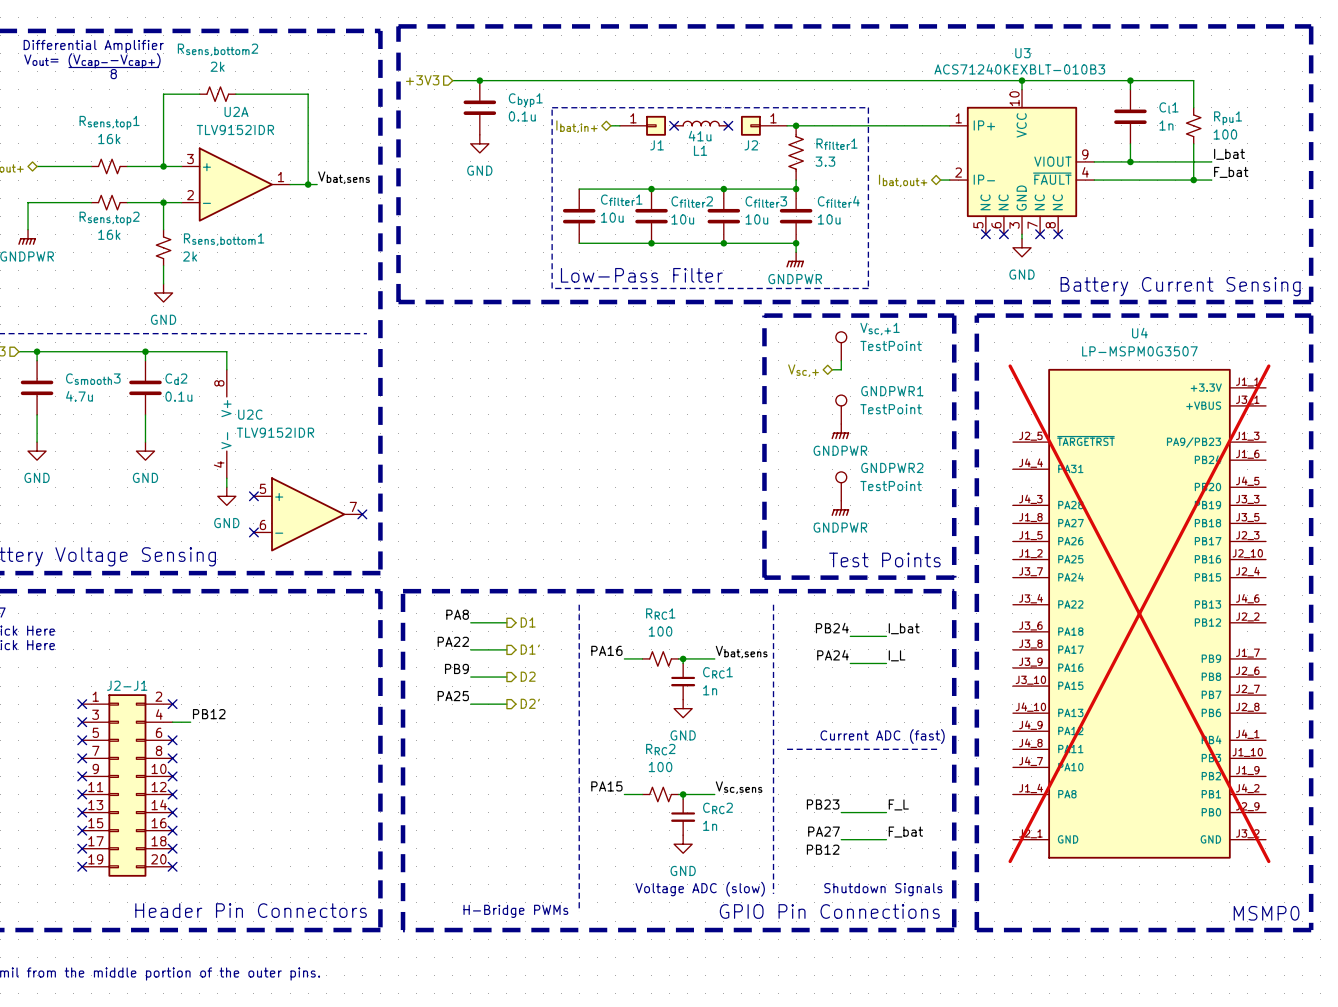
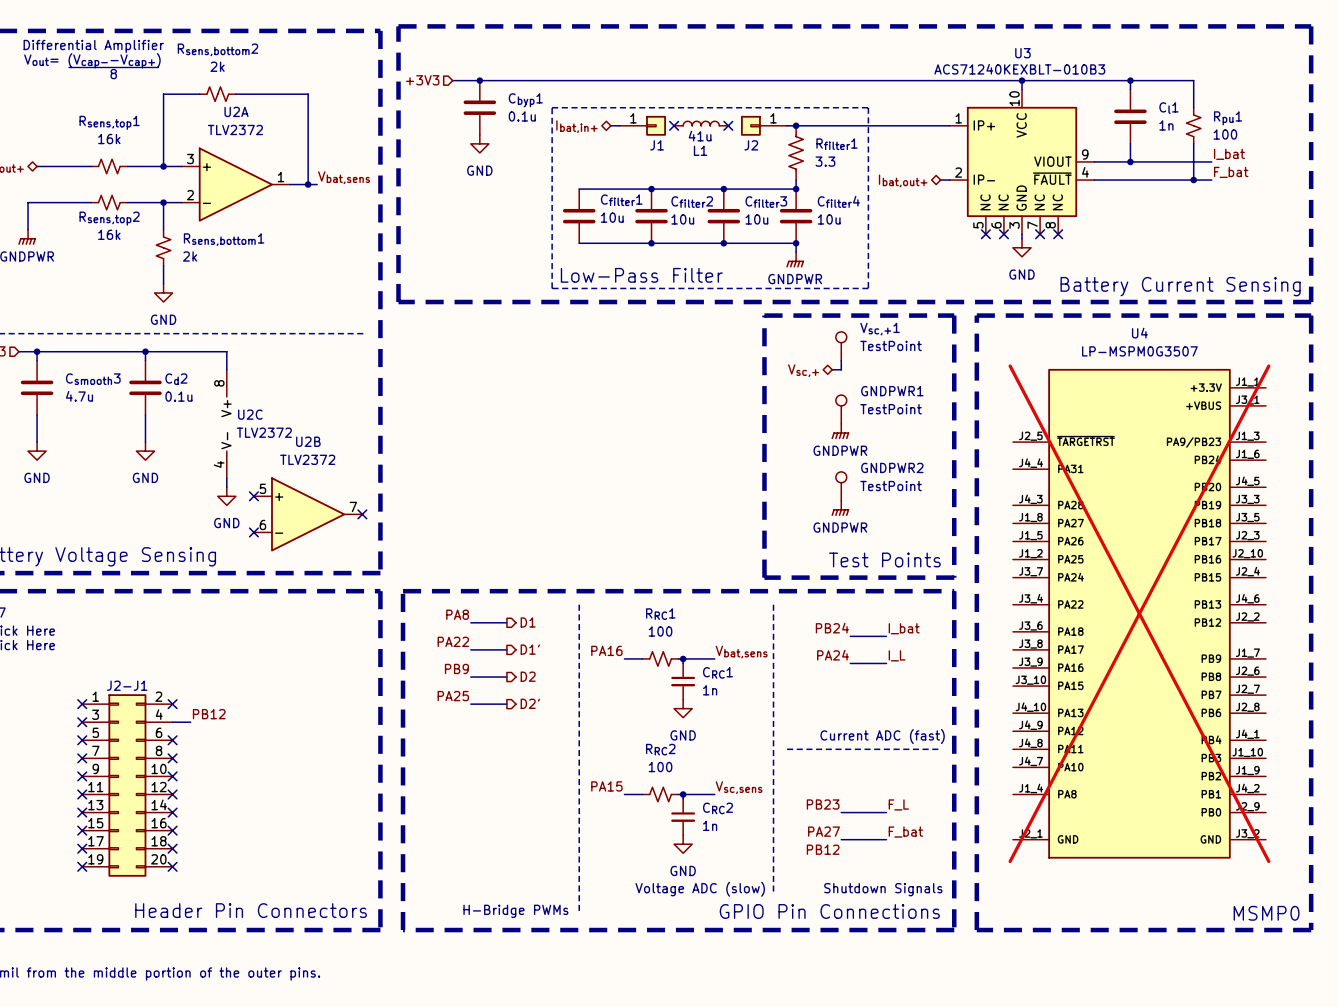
U2A value: TLV9152IDR (235, 129) -> TLV2372 (235, 129)
U2C value: TLV9152IDR (275, 432) -> TLV2372 (264, 432)
U2B name: none -> U2B (308, 441)
U2B value: none -> TLV2372 (307, 459)

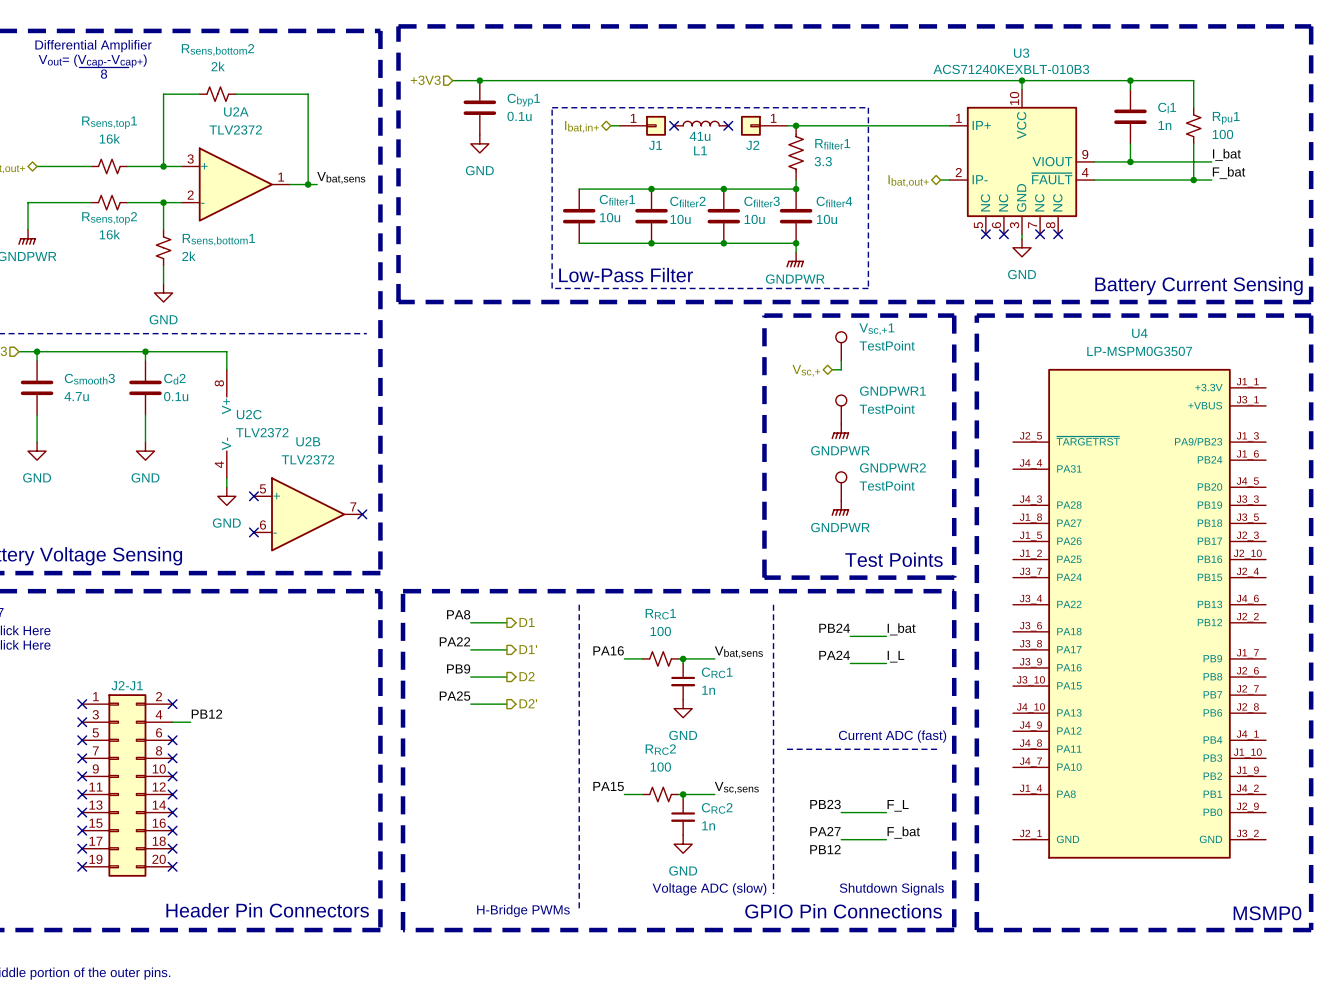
U4 do-not-place cross: (1139, 613) -> none

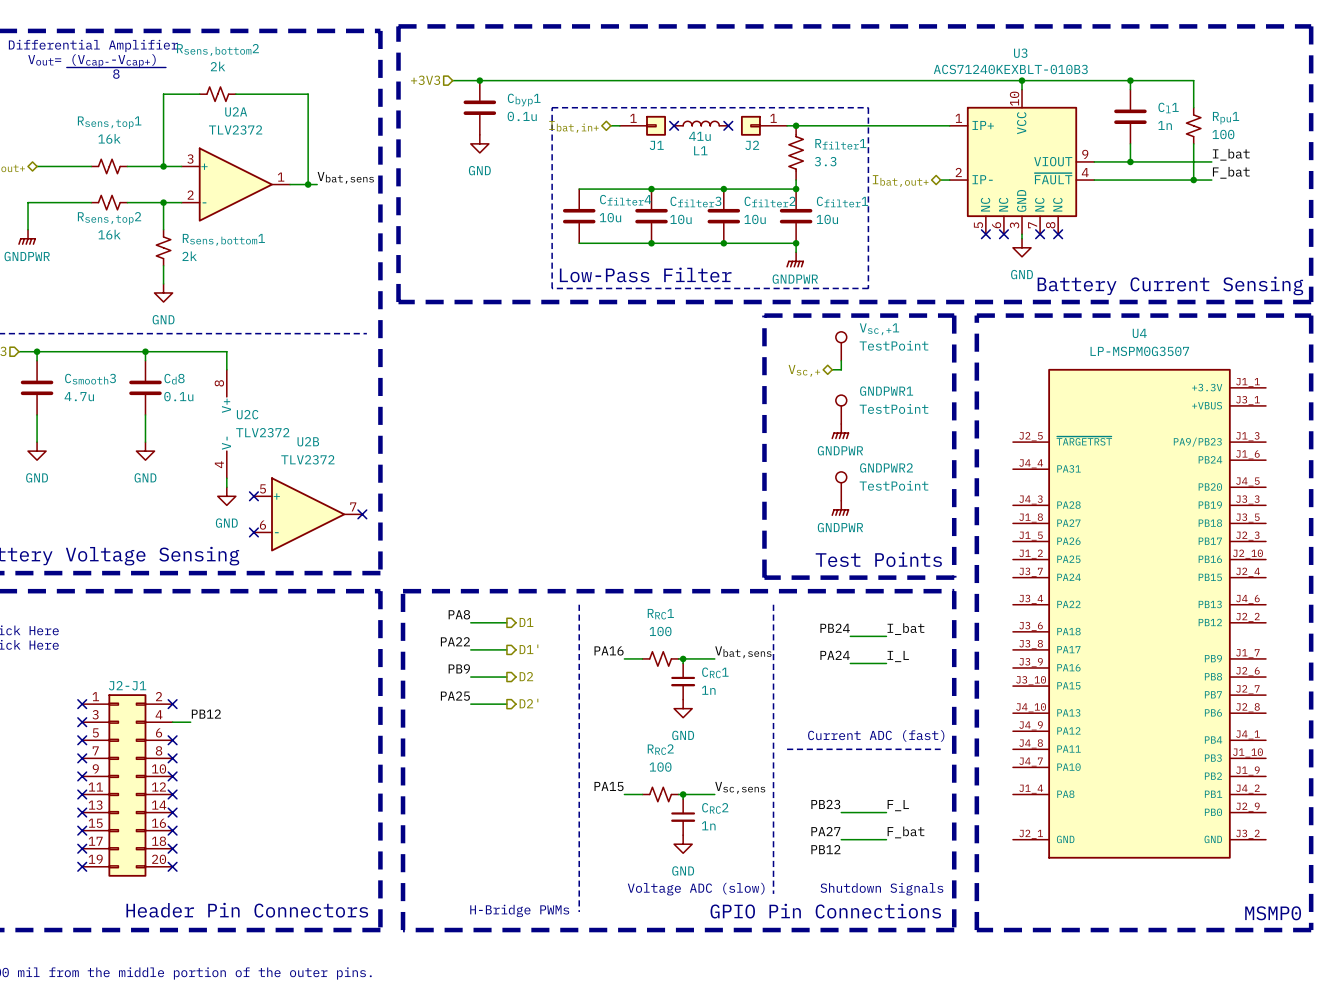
Cfilter1 name: Cfilter1 (617, 200) -> Cfilter4 (625, 200)
Cfilter2 name: Cfilter2 (687, 202) -> Cfilter3 (695, 202)
Cfilter3 name: Cfilter3 (762, 202) -> Cfilter2 (770, 202)
Cfilter4 name: Cfilter4 (834, 202) -> Cfilter1 (842, 202)
Cd2 name: Cd2 (174, 379) -> Cd8 (174, 379)

